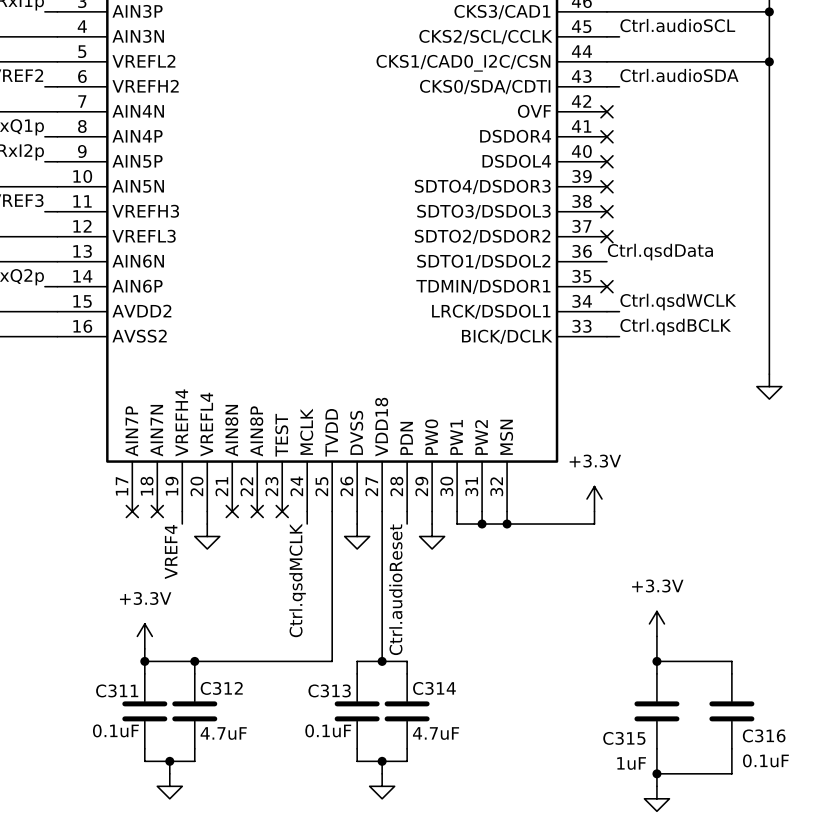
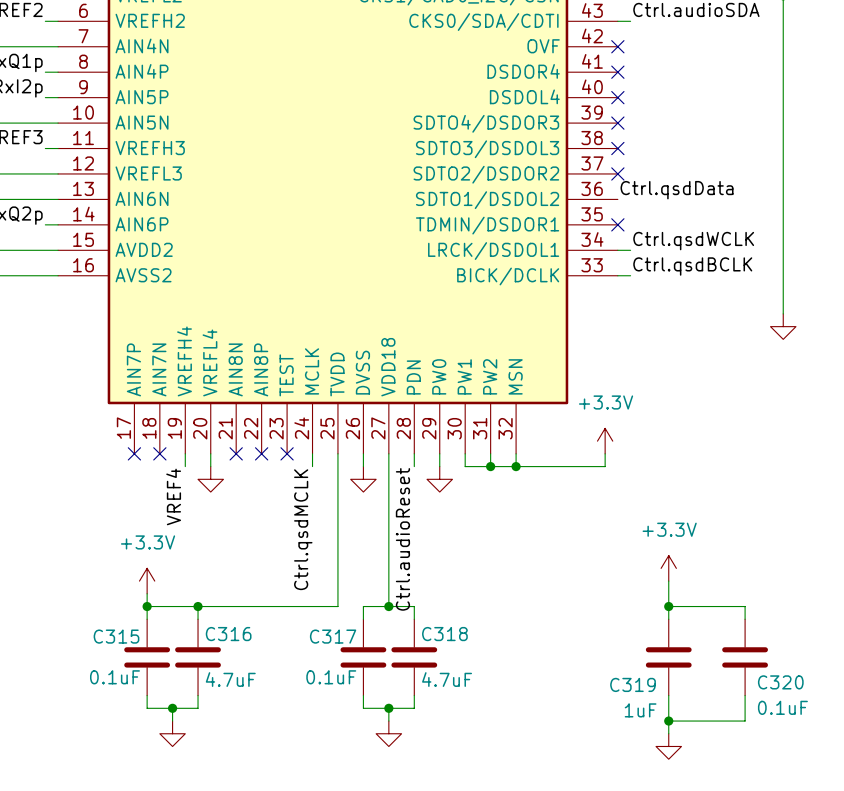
C312 name: C312 (221, 688) -> C316 (228, 634)
C314 name: C314 (434, 688) -> C318 (444, 634)
C311 name: C311 (117, 690) -> C315 (116, 636)
C313 name: C313 (329, 690) -> C317 (333, 636)
C316 name: C316 (764, 735) -> C320 (780, 682)
C315 name: C315 (624, 738) -> C319 (633, 684)

